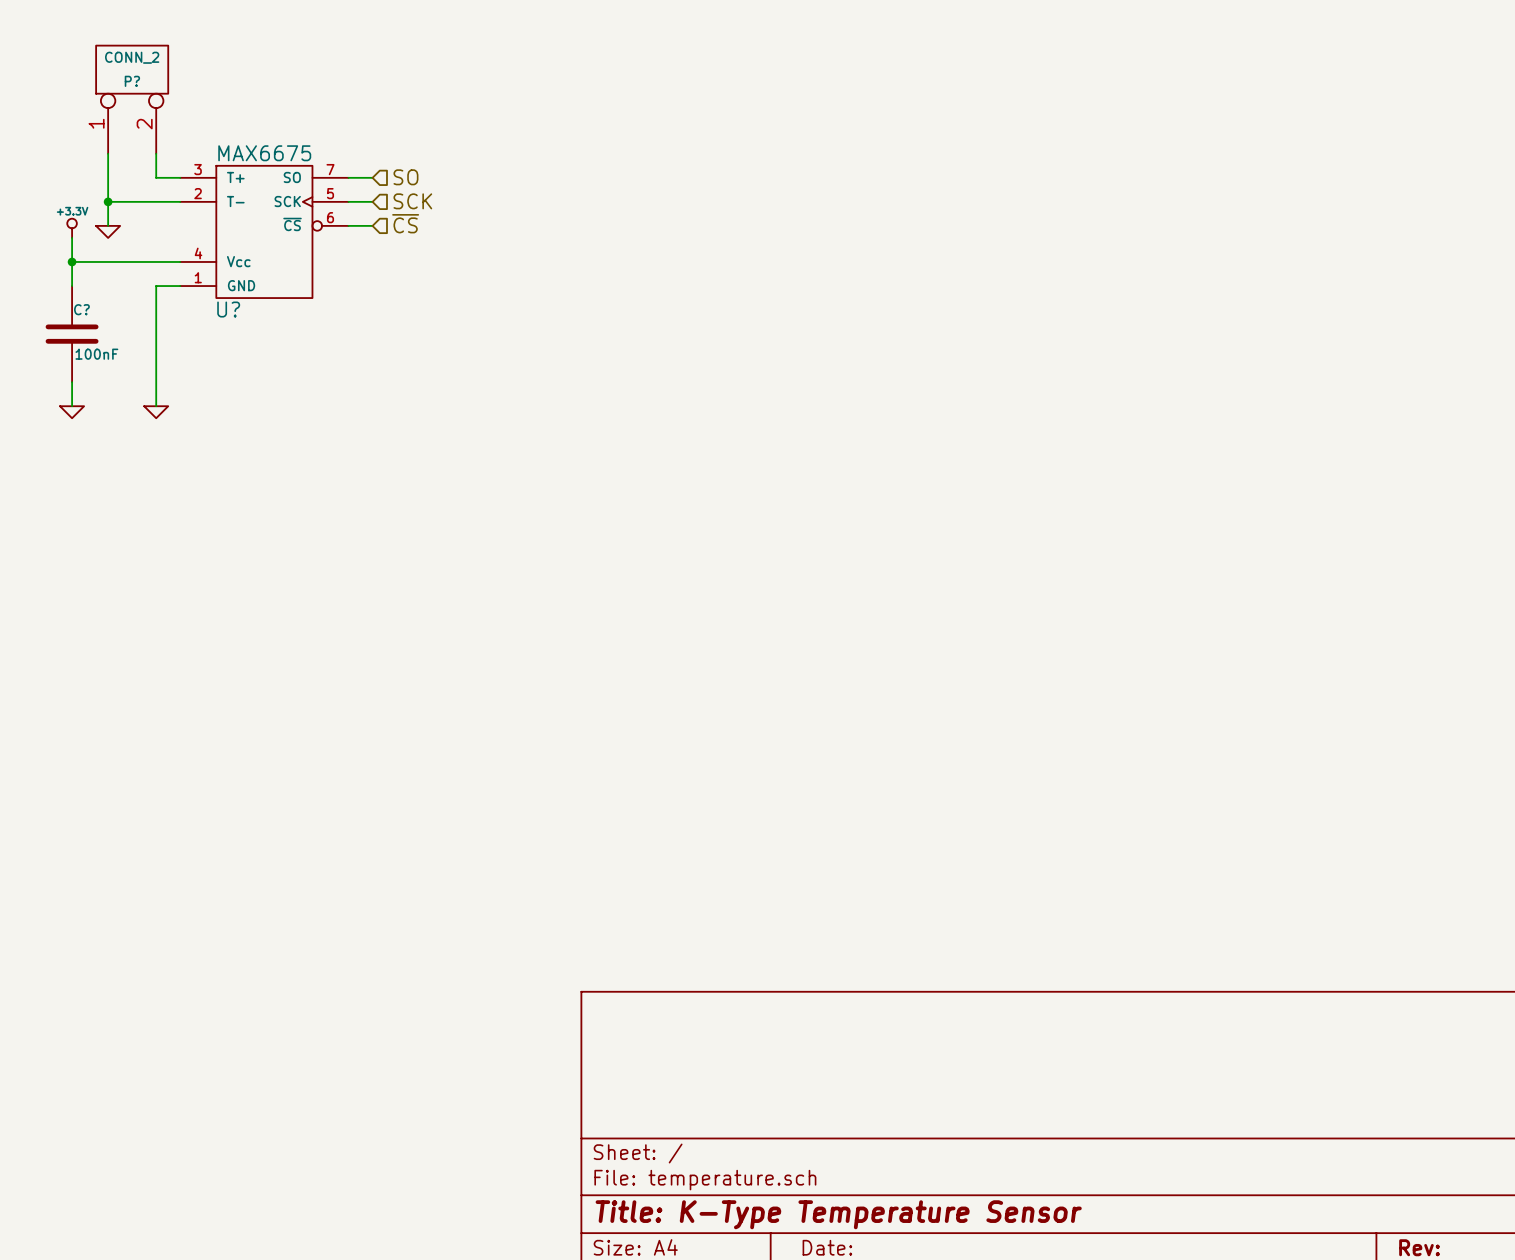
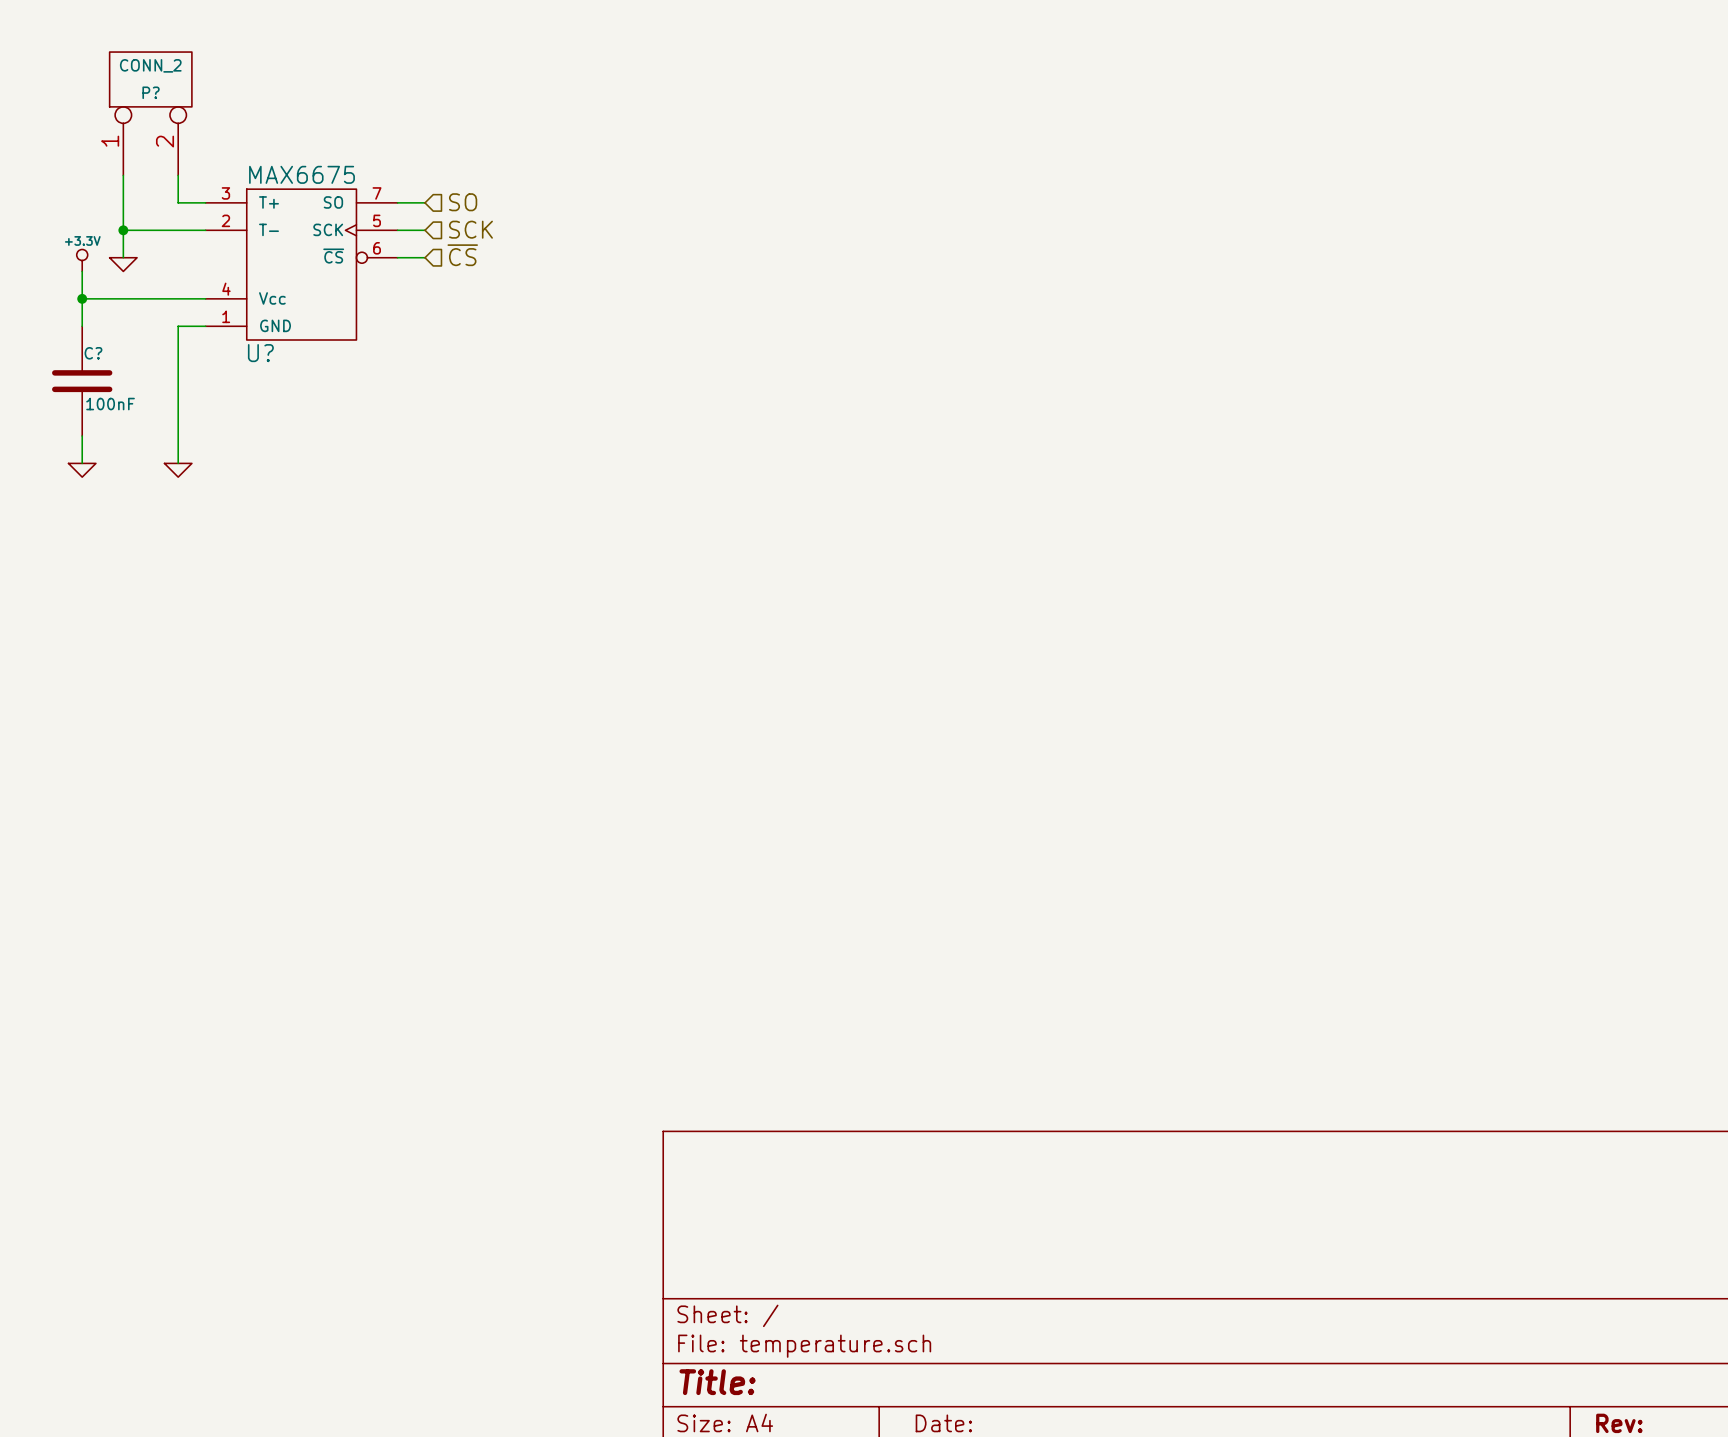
title block: Title: K-Type Temperature Sensor (838, 1214) -> Title: (717, 1382)

